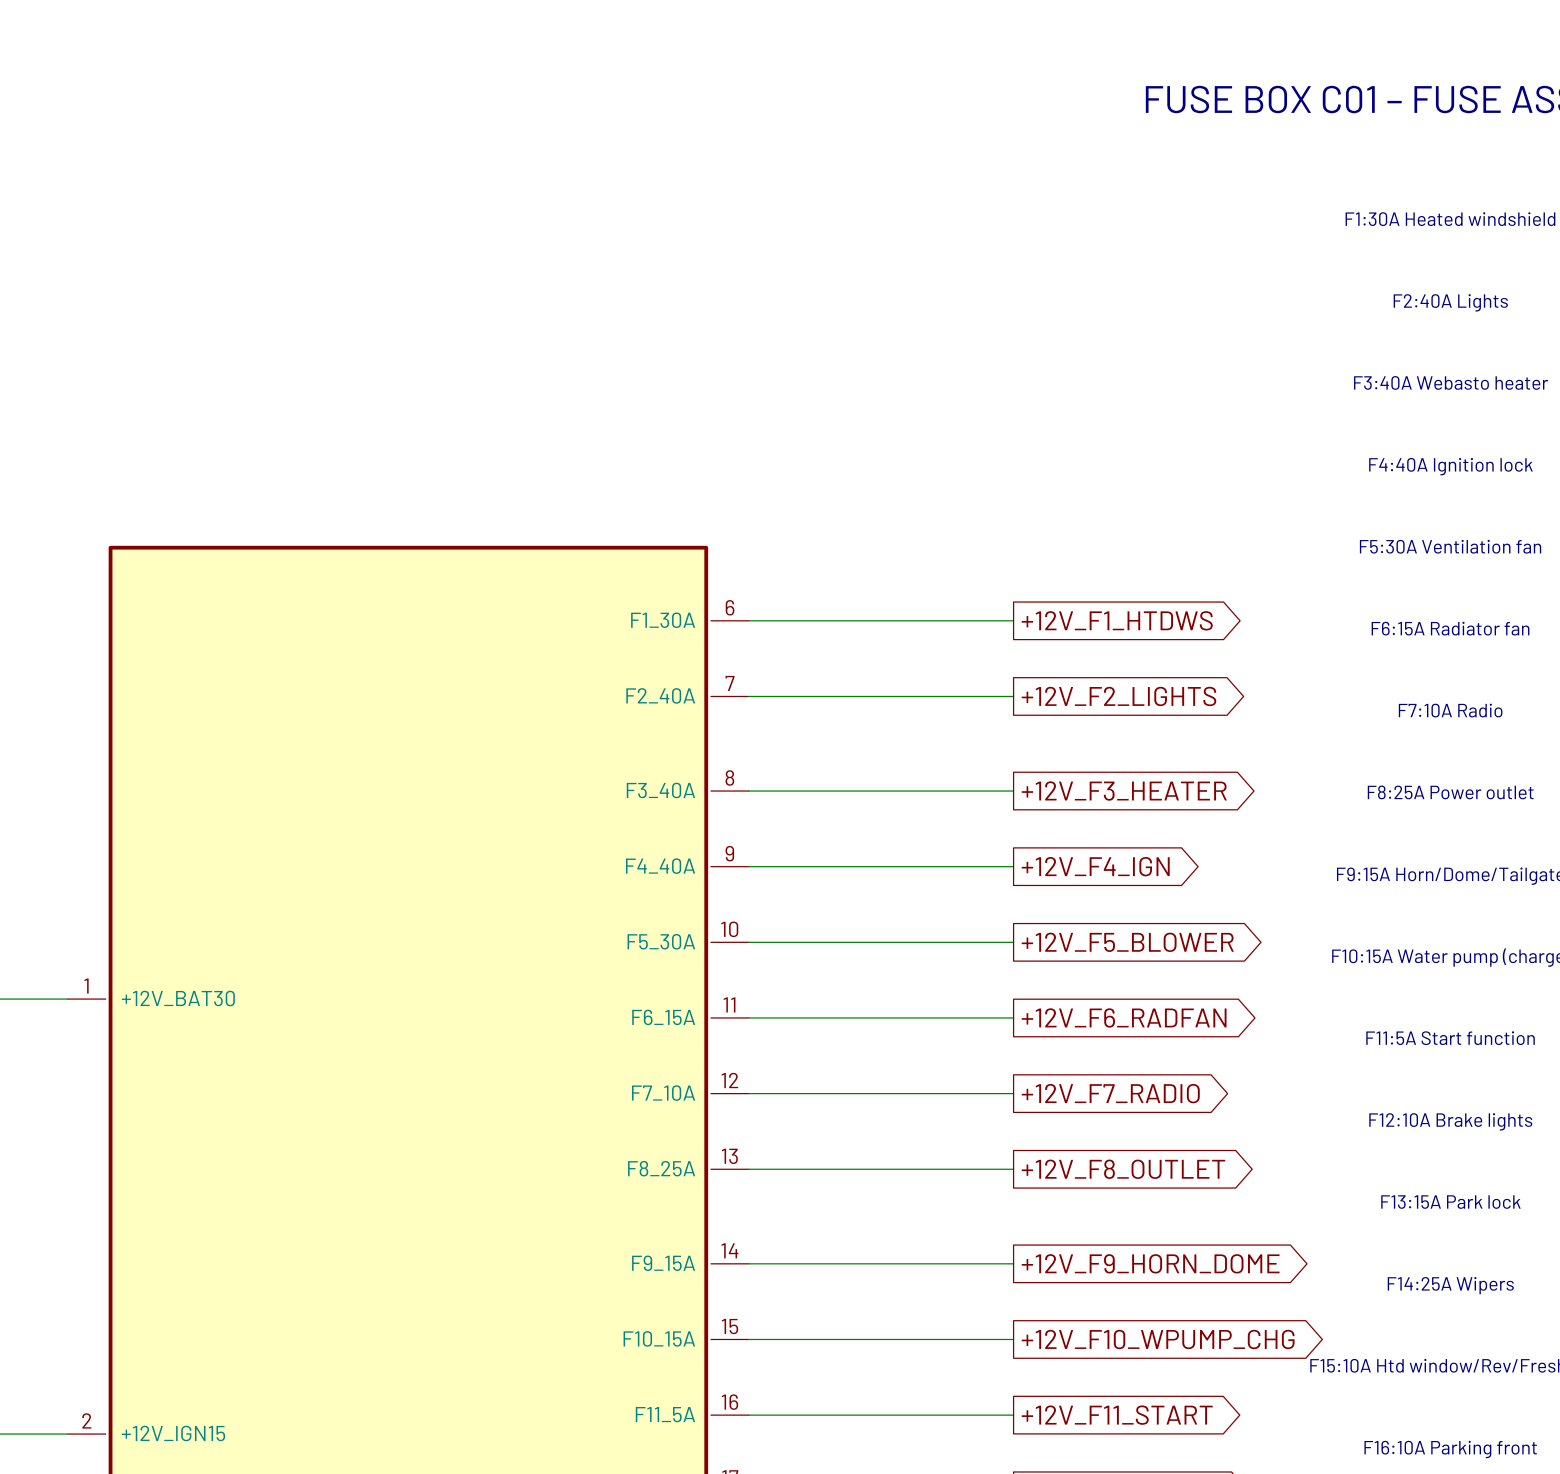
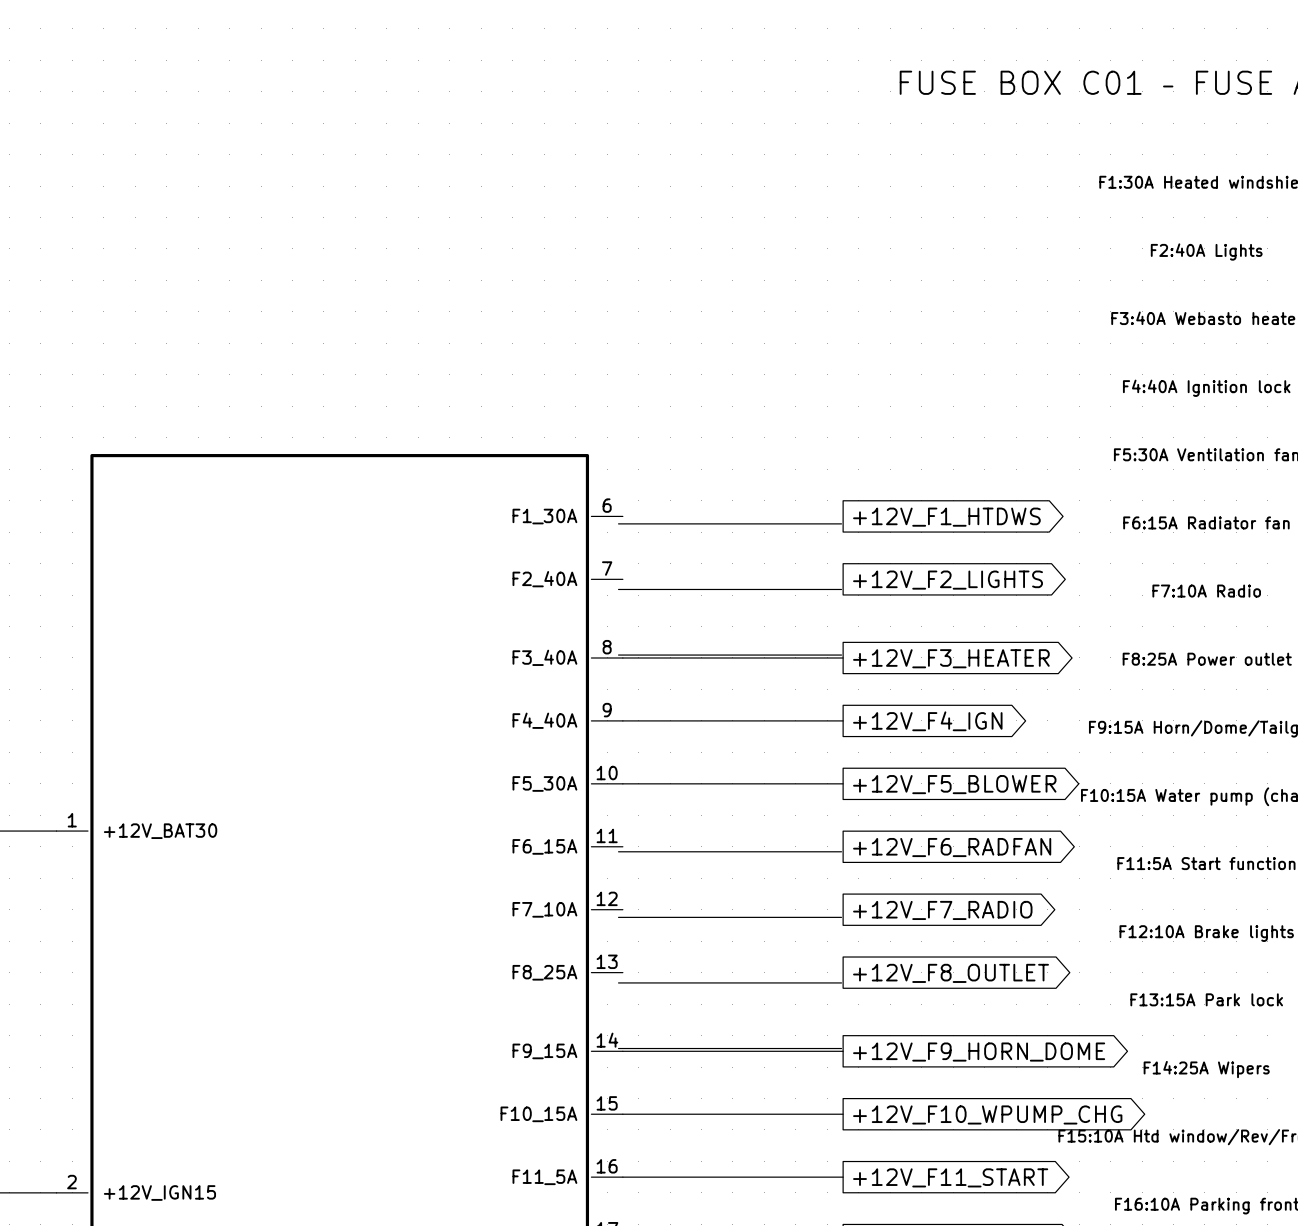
wire: (748, 620) (1013, 620) -> none
wire: none -> (618, 523) (841, 523)
wire: (748, 696) (1013, 696) -> none
wire: none -> (618, 589) (841, 589)
wire: none -> (618, 655) (841, 655)
wire: (748, 1017) (1013, 1017) -> none
wire: none -> (618, 851) (841, 851)
wire: (748, 1093) (1013, 1093) -> none
wire: none -> (618, 917) (841, 917)
wire: (748, 1169) (1013, 1169) -> none
wire: none -> (618, 982) (841, 982)
wire: none -> (618, 1048) (841, 1048)

